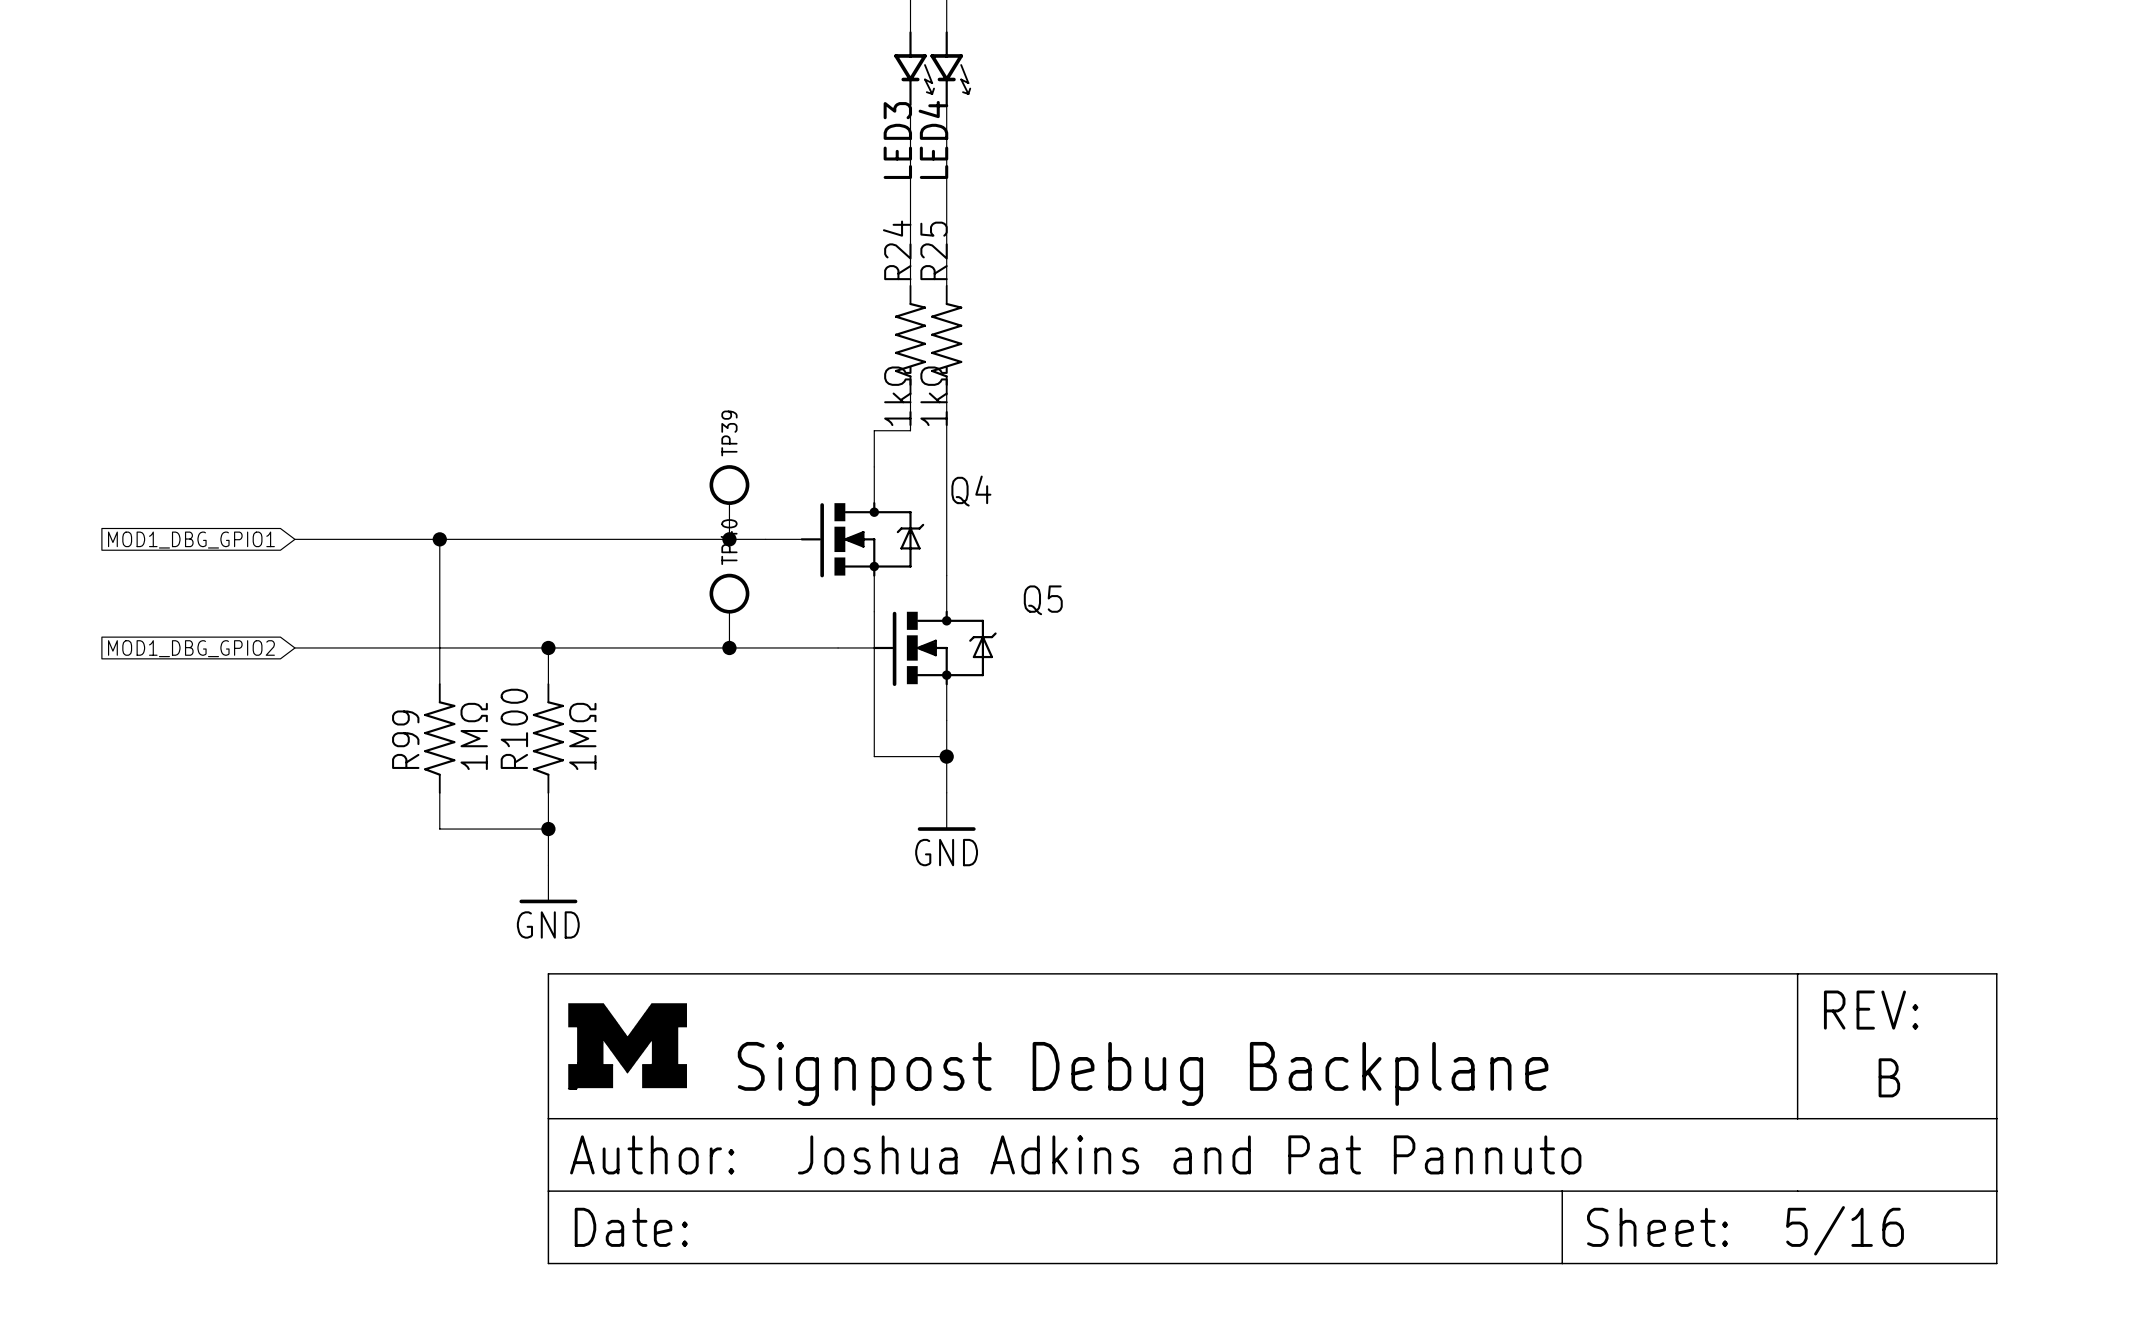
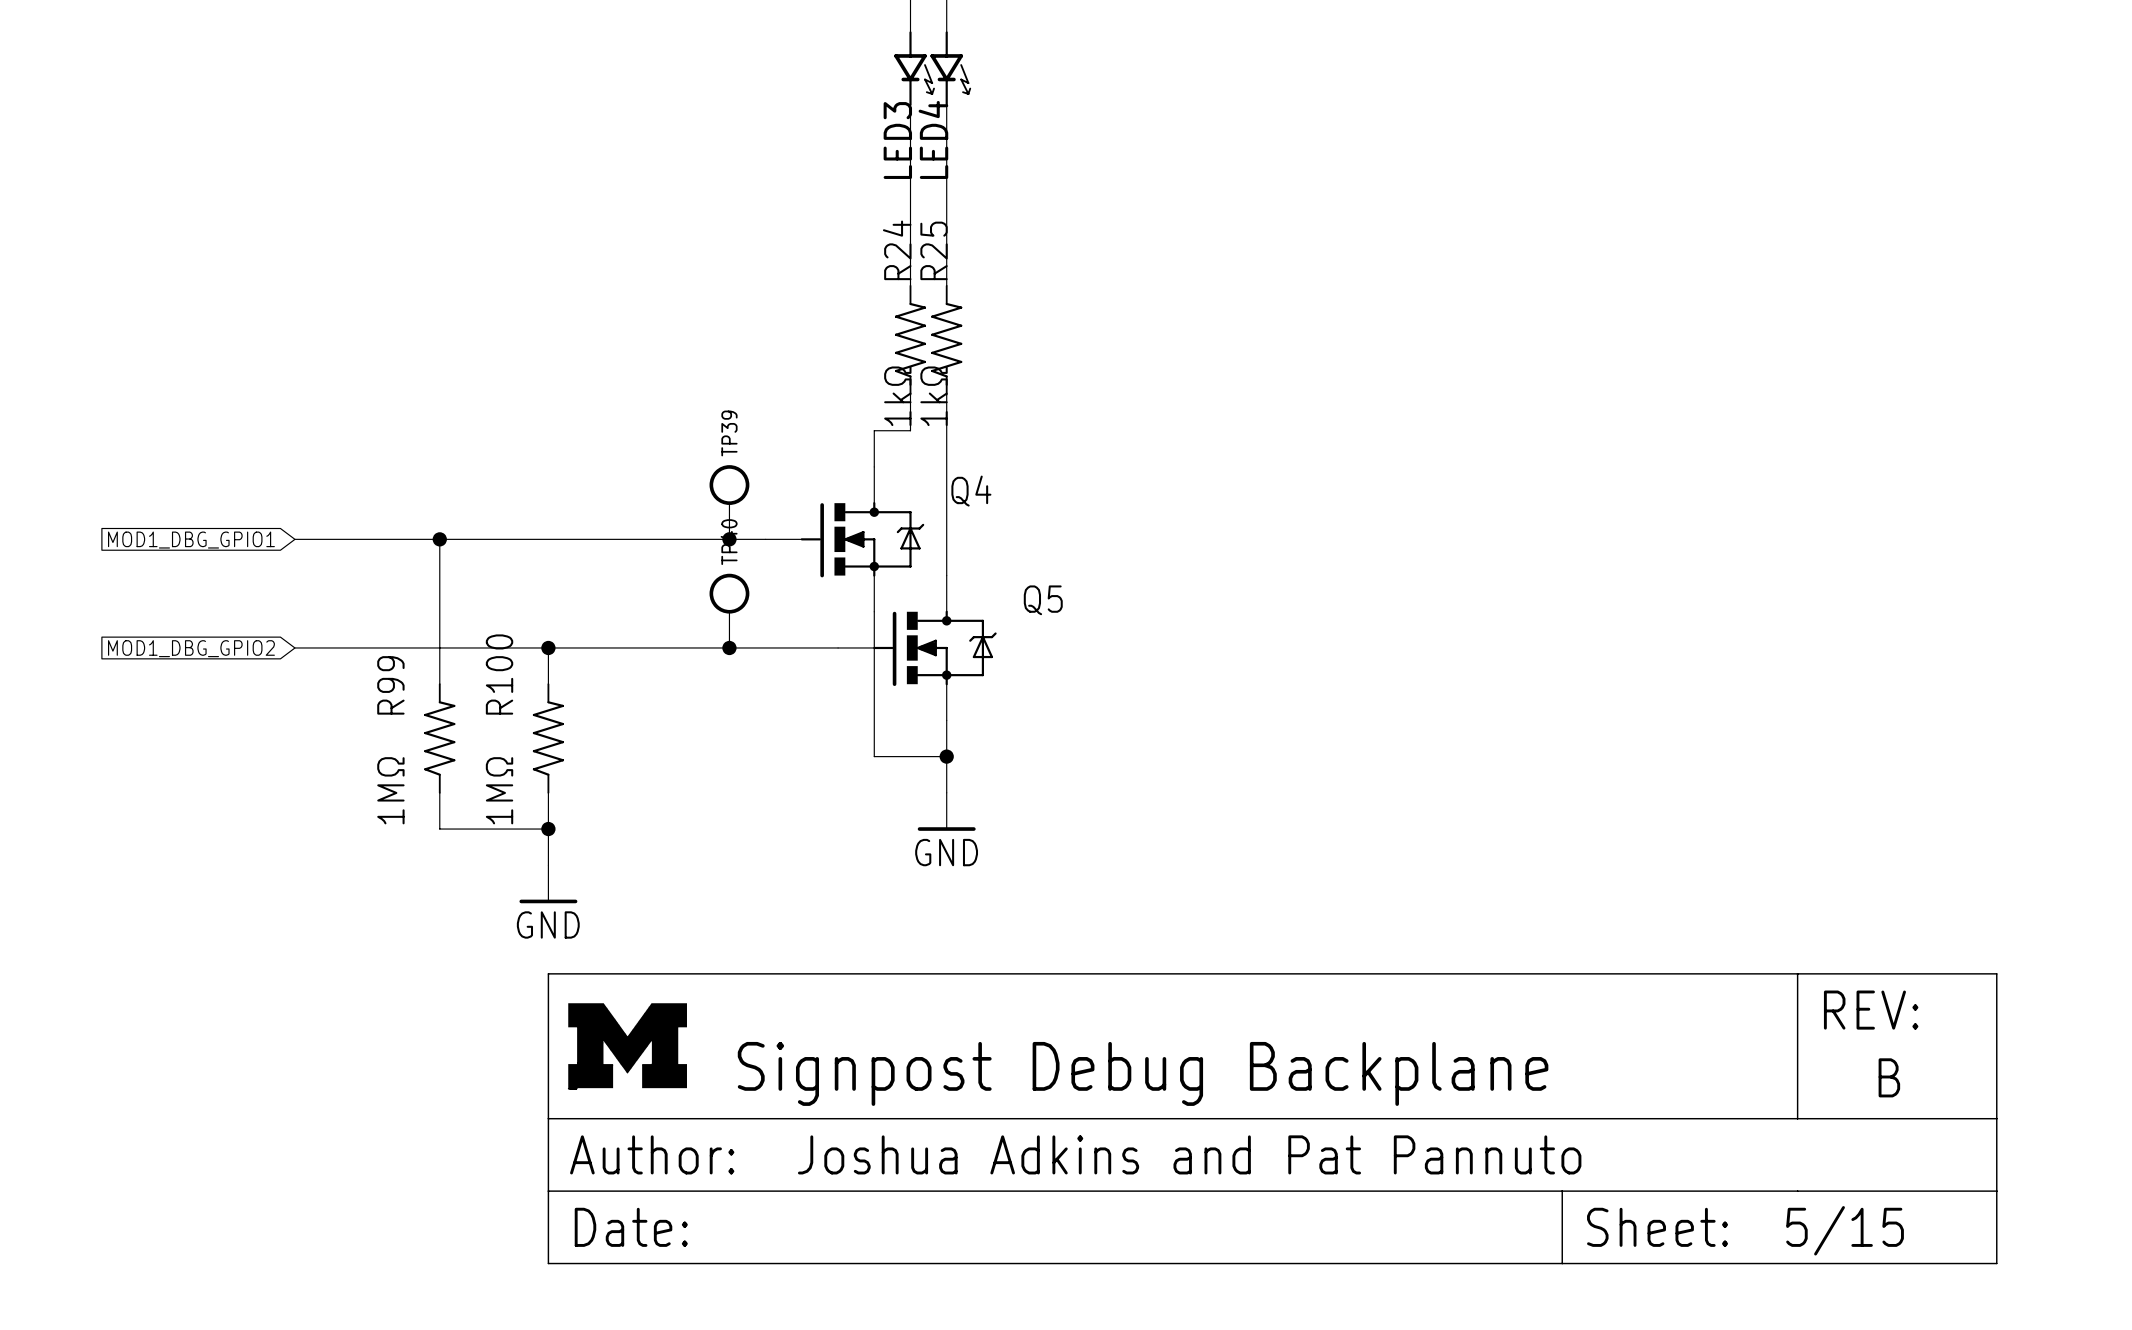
R100 name position: R100 (514, 728) -> R100 (499, 674)
R99 value position: 1MΩ (474, 736) -> 1MΩ (390, 790)
R100 value position: 1MΩ (582, 736) -> 1MΩ (499, 790)
R99 name position: R99 (405, 739) -> R99 (390, 685)
part text: 5/16 (1845, 1230) -> 5/15 (1845, 1230)

